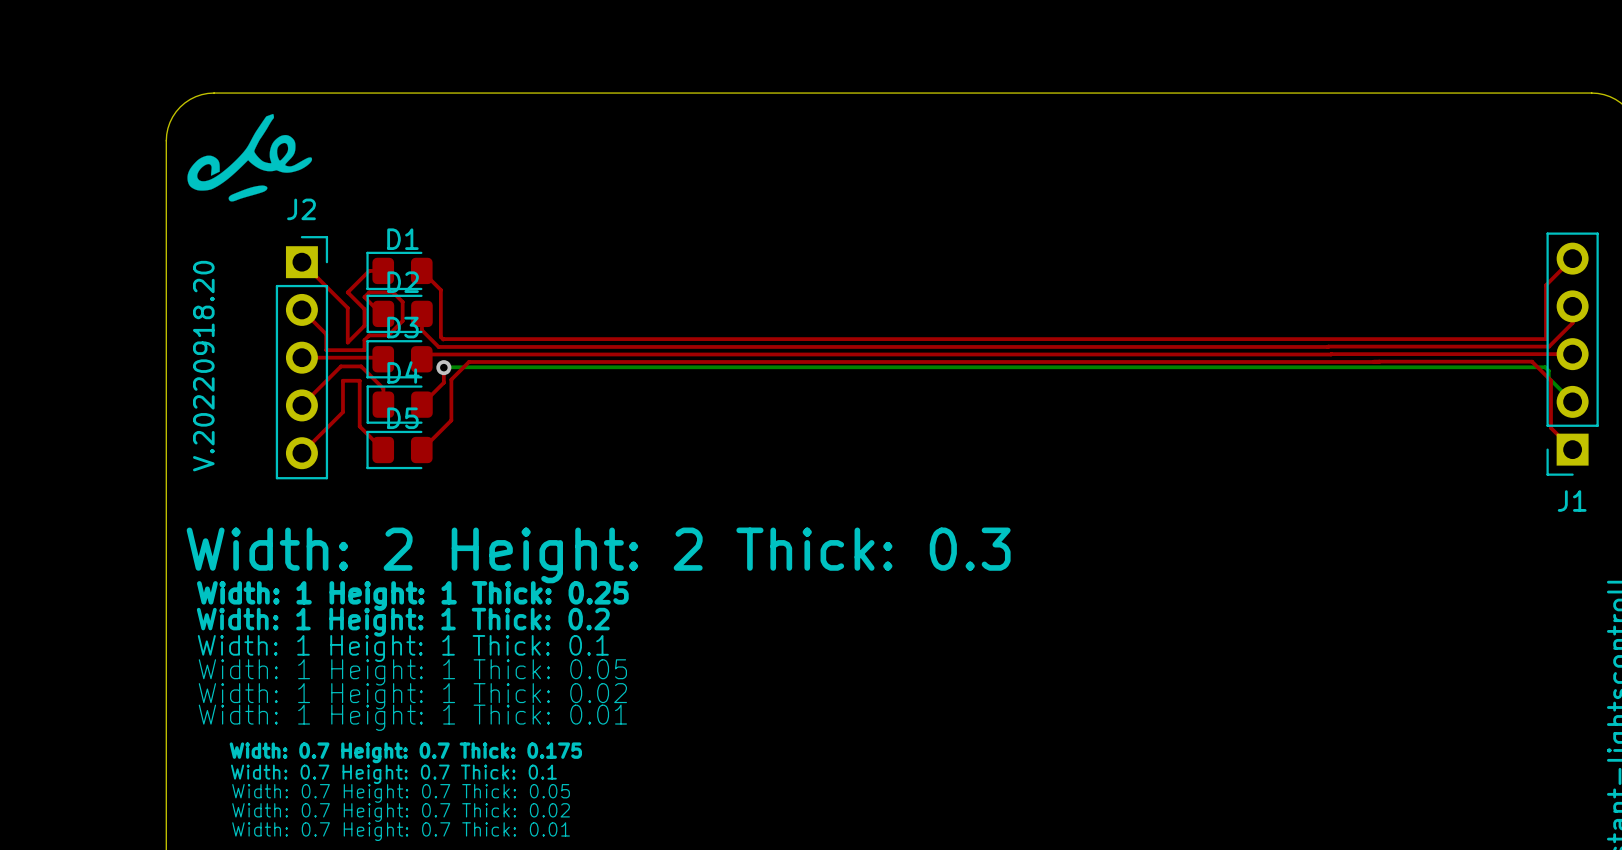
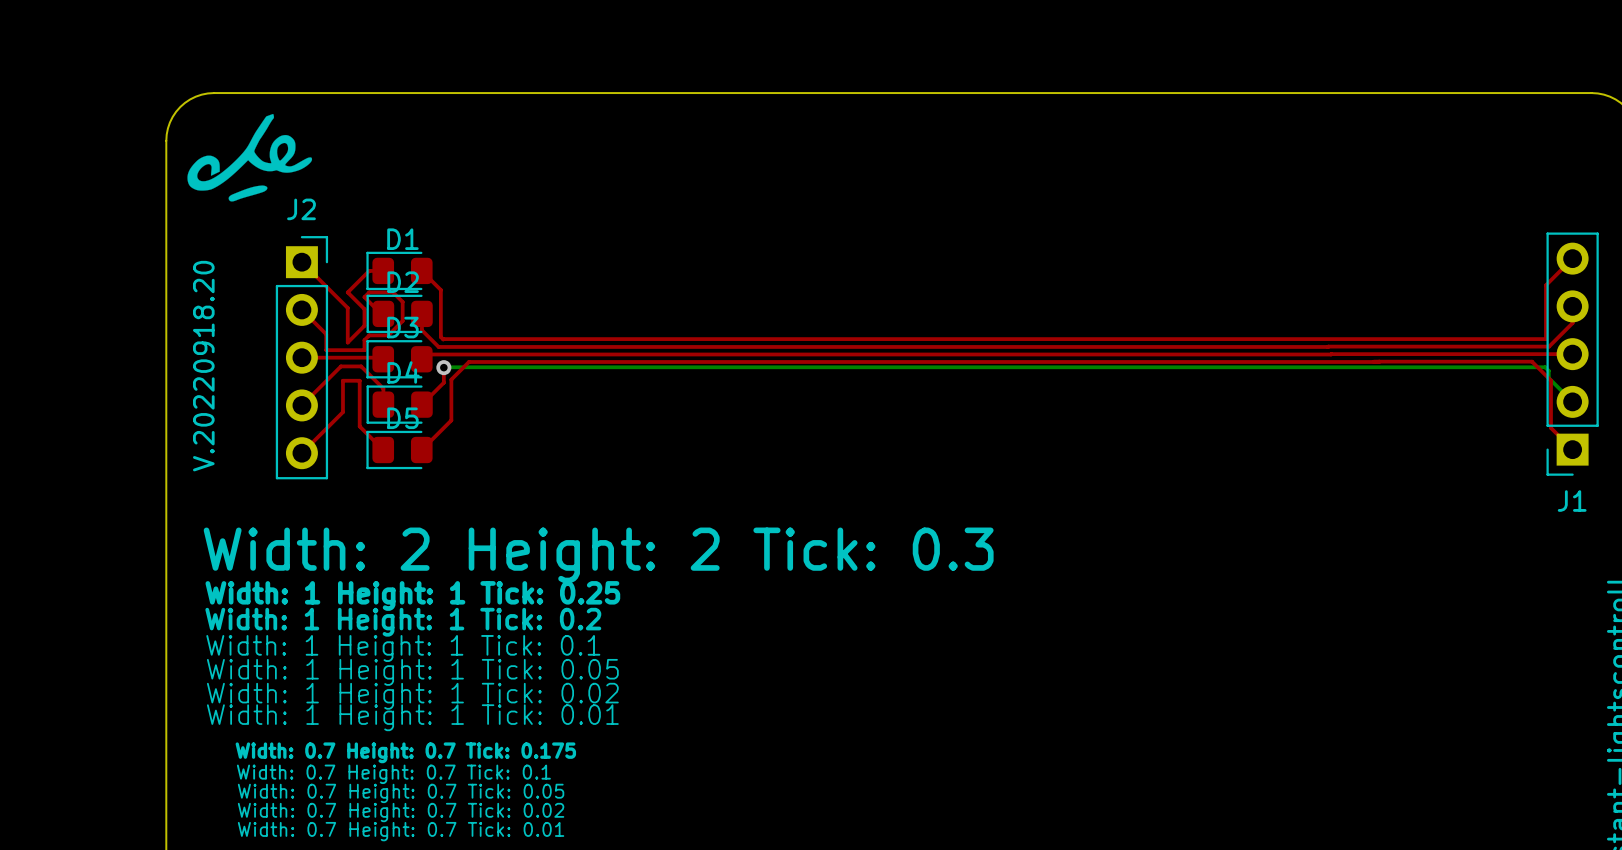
text: Width: 2 Height: 2 Thick: 0.3 (598, 555) -> Width: 2 Height: 2 Tick: 0.3 (598, 555)
text: Width: 1 Height: 1 Thick: 0.25 (412, 595) -> Width: 1 Height: 1 Tick: 0.25 (412, 595)
text: Width: 1 Height: 1 Thick: 0.2 (403, 622) -> Width: 1 Height: 1 Tick: 0.2 (403, 622)
text: Width: 1 Height: 1 Thick: 0.1 (403, 648) -> Width: 1 Height: 1 Tick: 0.1 (403, 648)
text: Width: 1 Height: 1 Thick: 0.05 (412, 672) -> Width: 1 Height: 1 Tick: 0.05 (412, 672)
text: Width: 1 Height: 1 Thick: 0.02 (412, 696) -> Width: 1 Height: 1 Tick: 0.02 (412, 696)
text: Width: 1 Height: 1 Thick: 0.01 (412, 717) -> Width: 1 Height: 1 Tick: 0.01 (412, 717)
text: Width: 0.7 Height: 0.7 Thick: 0.175 (405, 752) -> Width: 0.7 Height: 0.7 Tick: 0.175 (405, 752)
text: Width: 0.7 Height: 0.7 Thick: 0.1 (393, 774) -> Width: 0.7 Height: 0.7 Tick: 0.1 (393, 774)
text: Width: 0.7 Height: 0.7 Thick: 0.05 (401, 793) -> Width: 0.7 Height: 0.7 Tick: 0.05 (401, 793)
text: Width: 0.7 Height: 0.7 Thick: 0.02 (401, 812) -> Width: 0.7 Height: 0.7 Tick: 0.02 (401, 812)
text: Width: 0.7 Height: 0.7 Thick: 0.01 (401, 831) -> Width: 0.7 Height: 0.7 Tick: 0.01 (401, 831)

